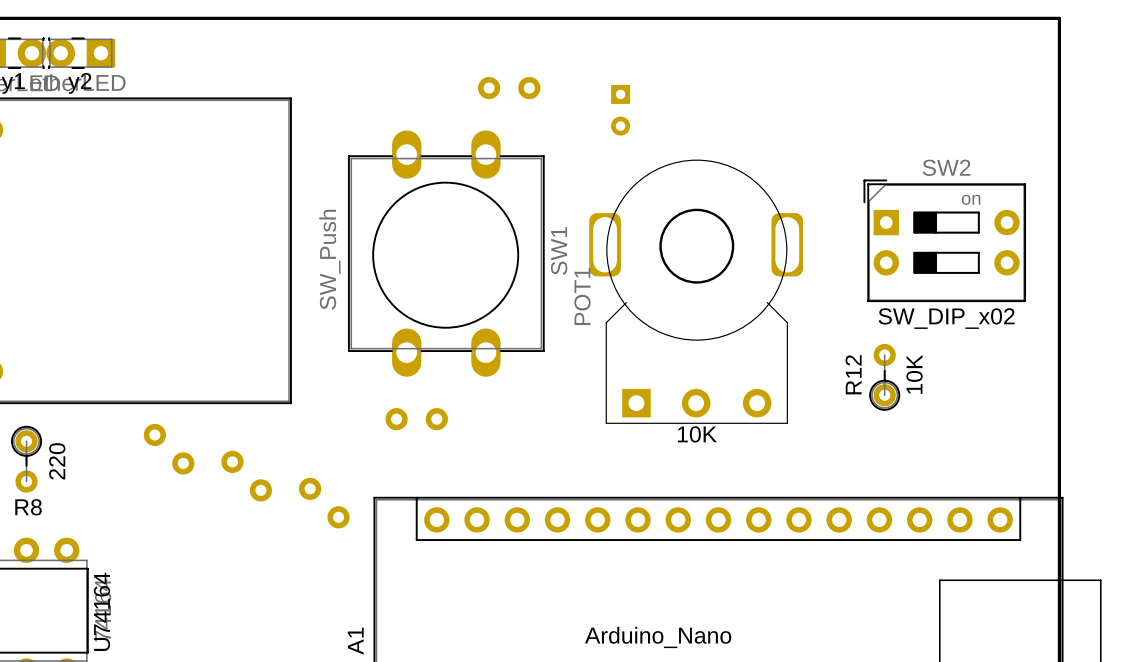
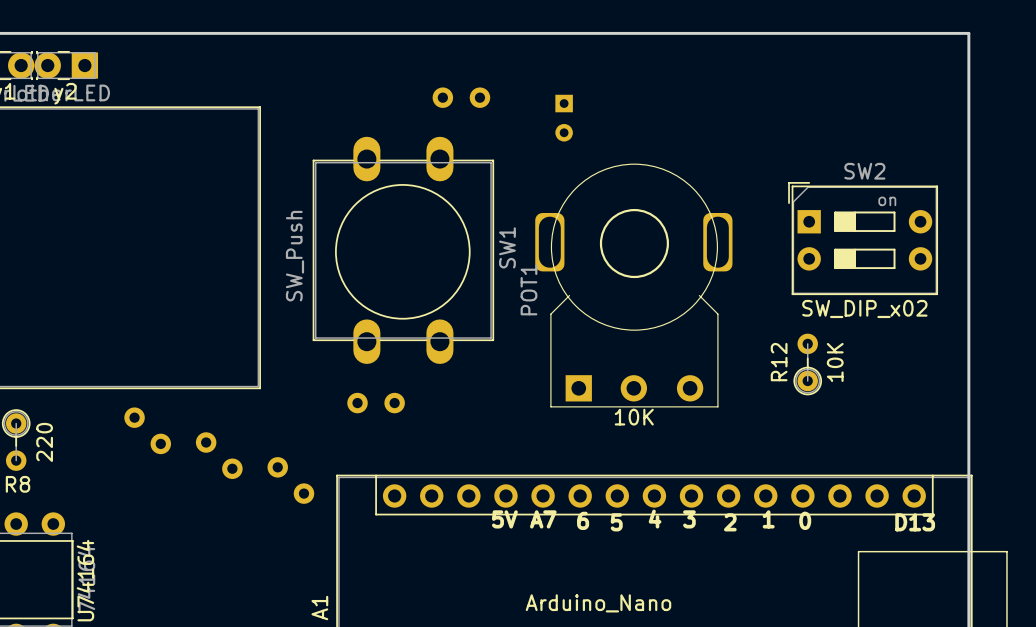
text: none -> 5V (504, 519)
text: none -> A7 (543, 519)
text: none -> 4 (655, 519)
text: none -> 3 (689, 519)
text: none -> 1 (768, 519)
text: none -> 6 (583, 520)
text: none -> 0 (805, 520)
text: none -> 5 (616, 522)
text: none -> 2 (730, 522)
text: none -> D13 (915, 522)

